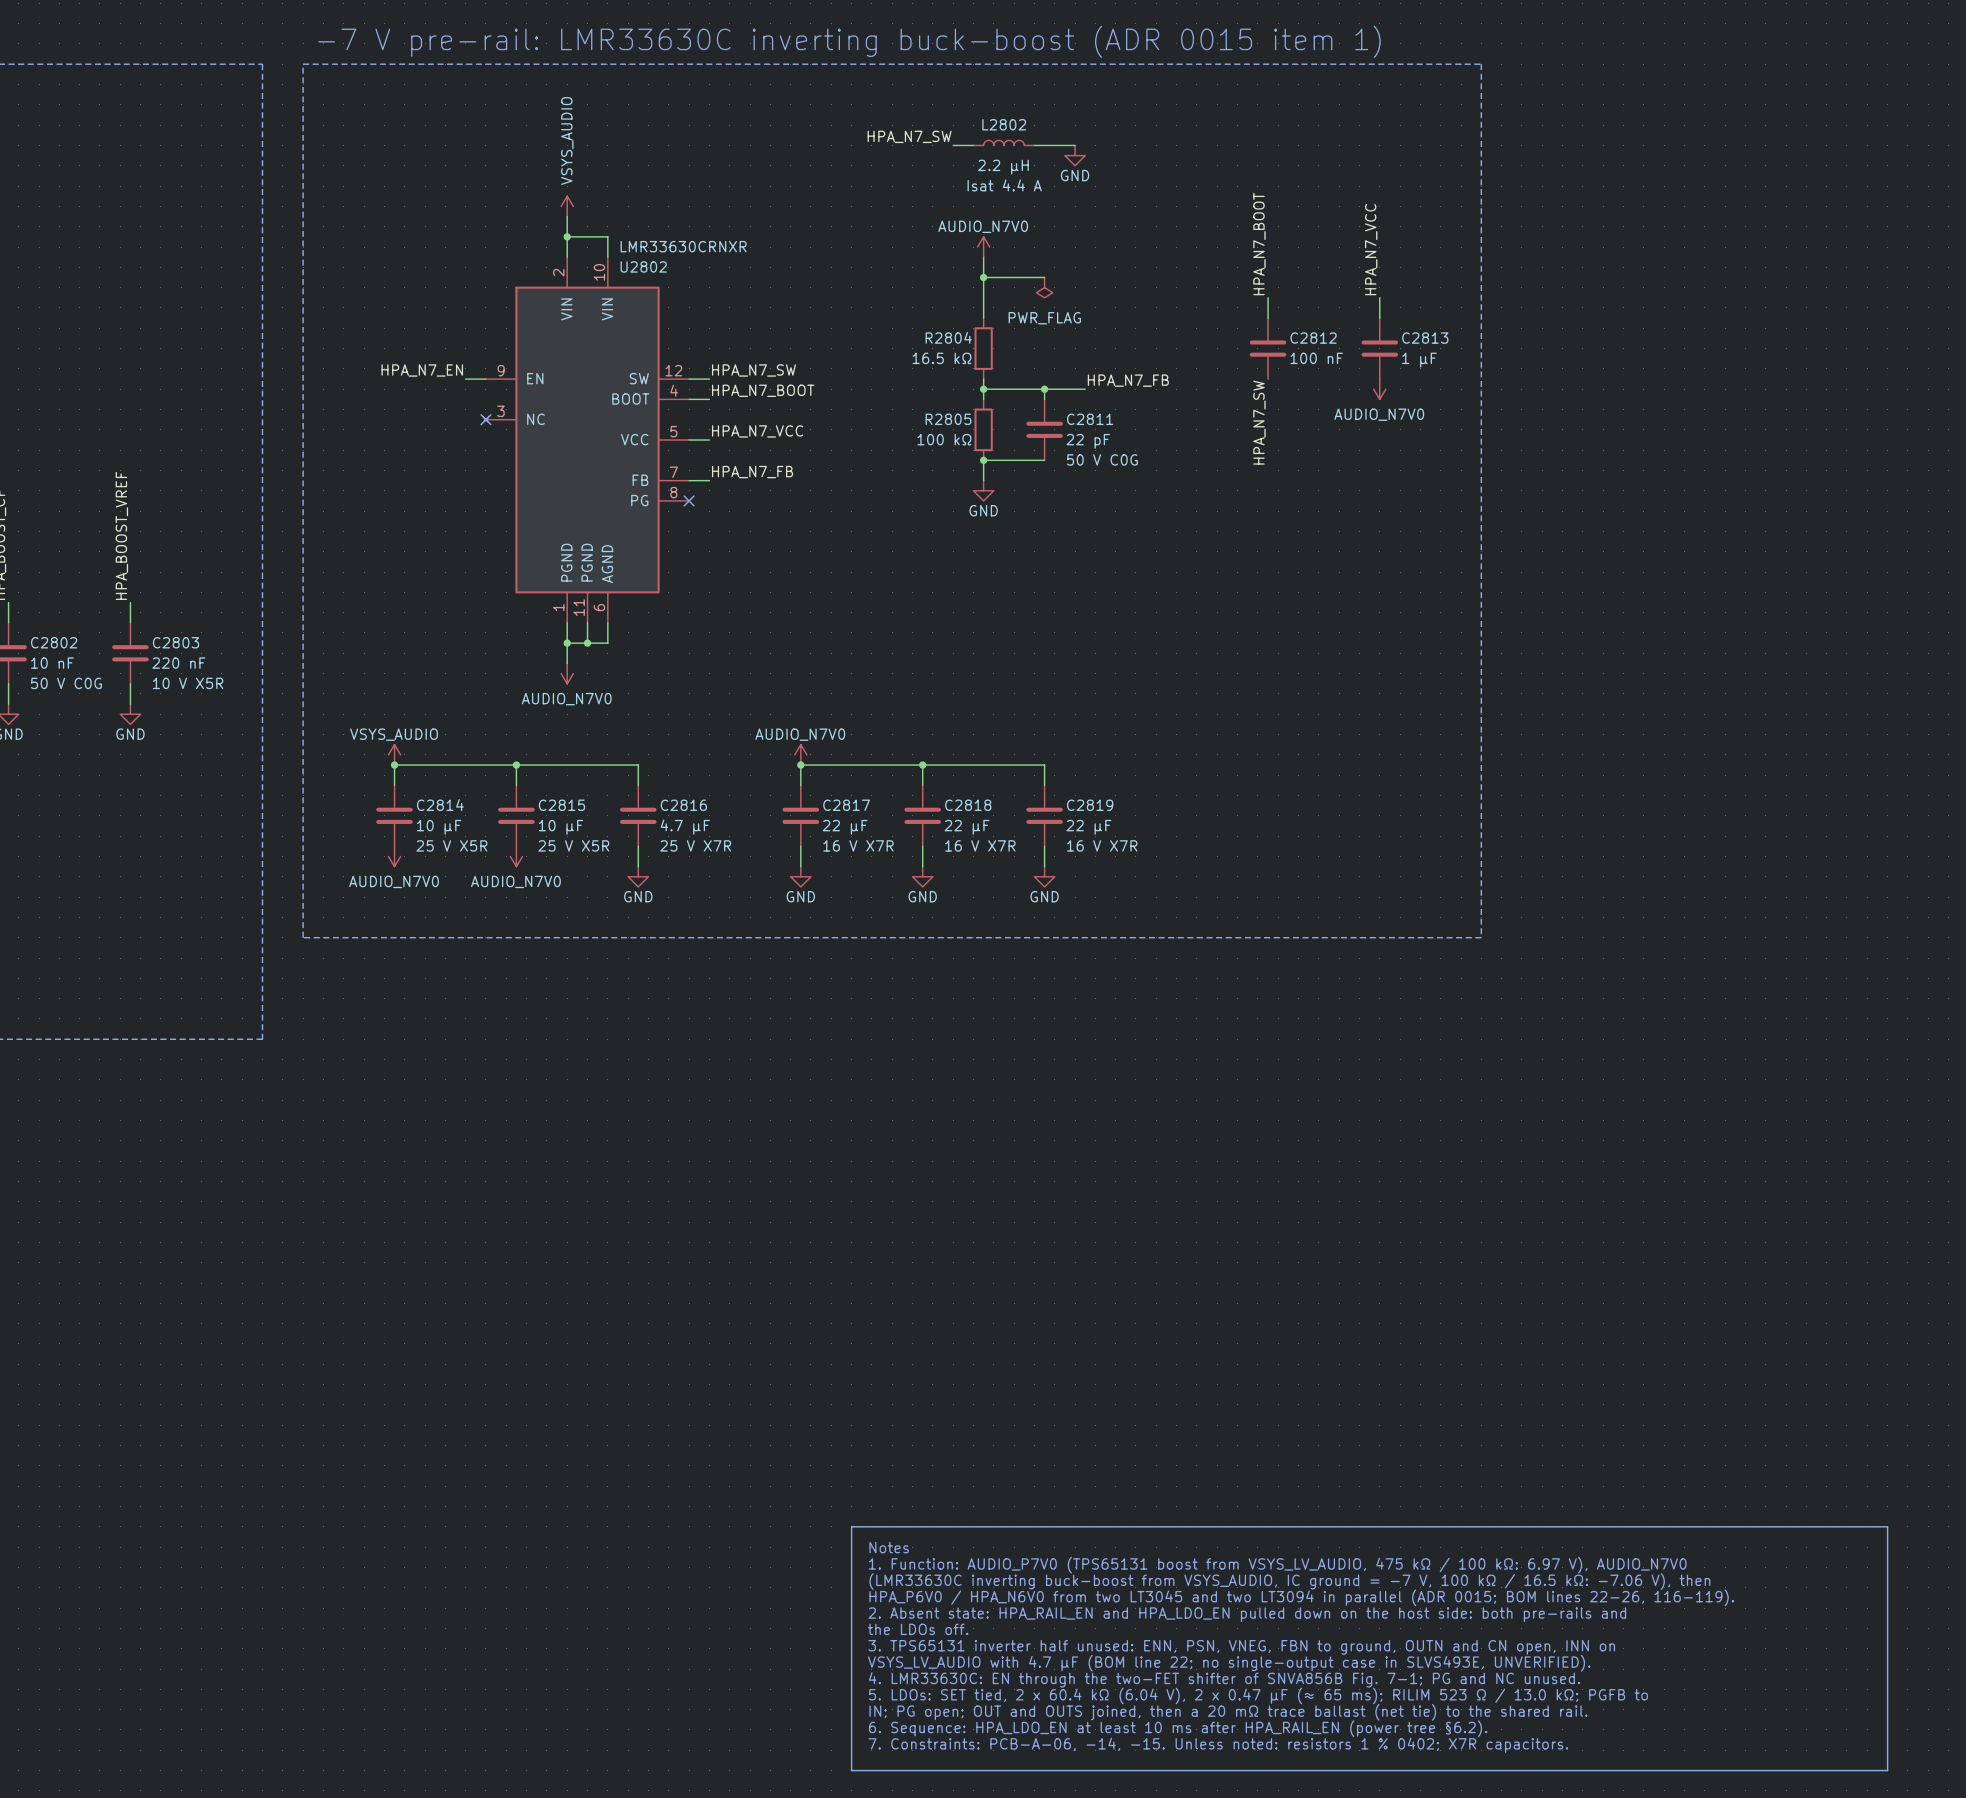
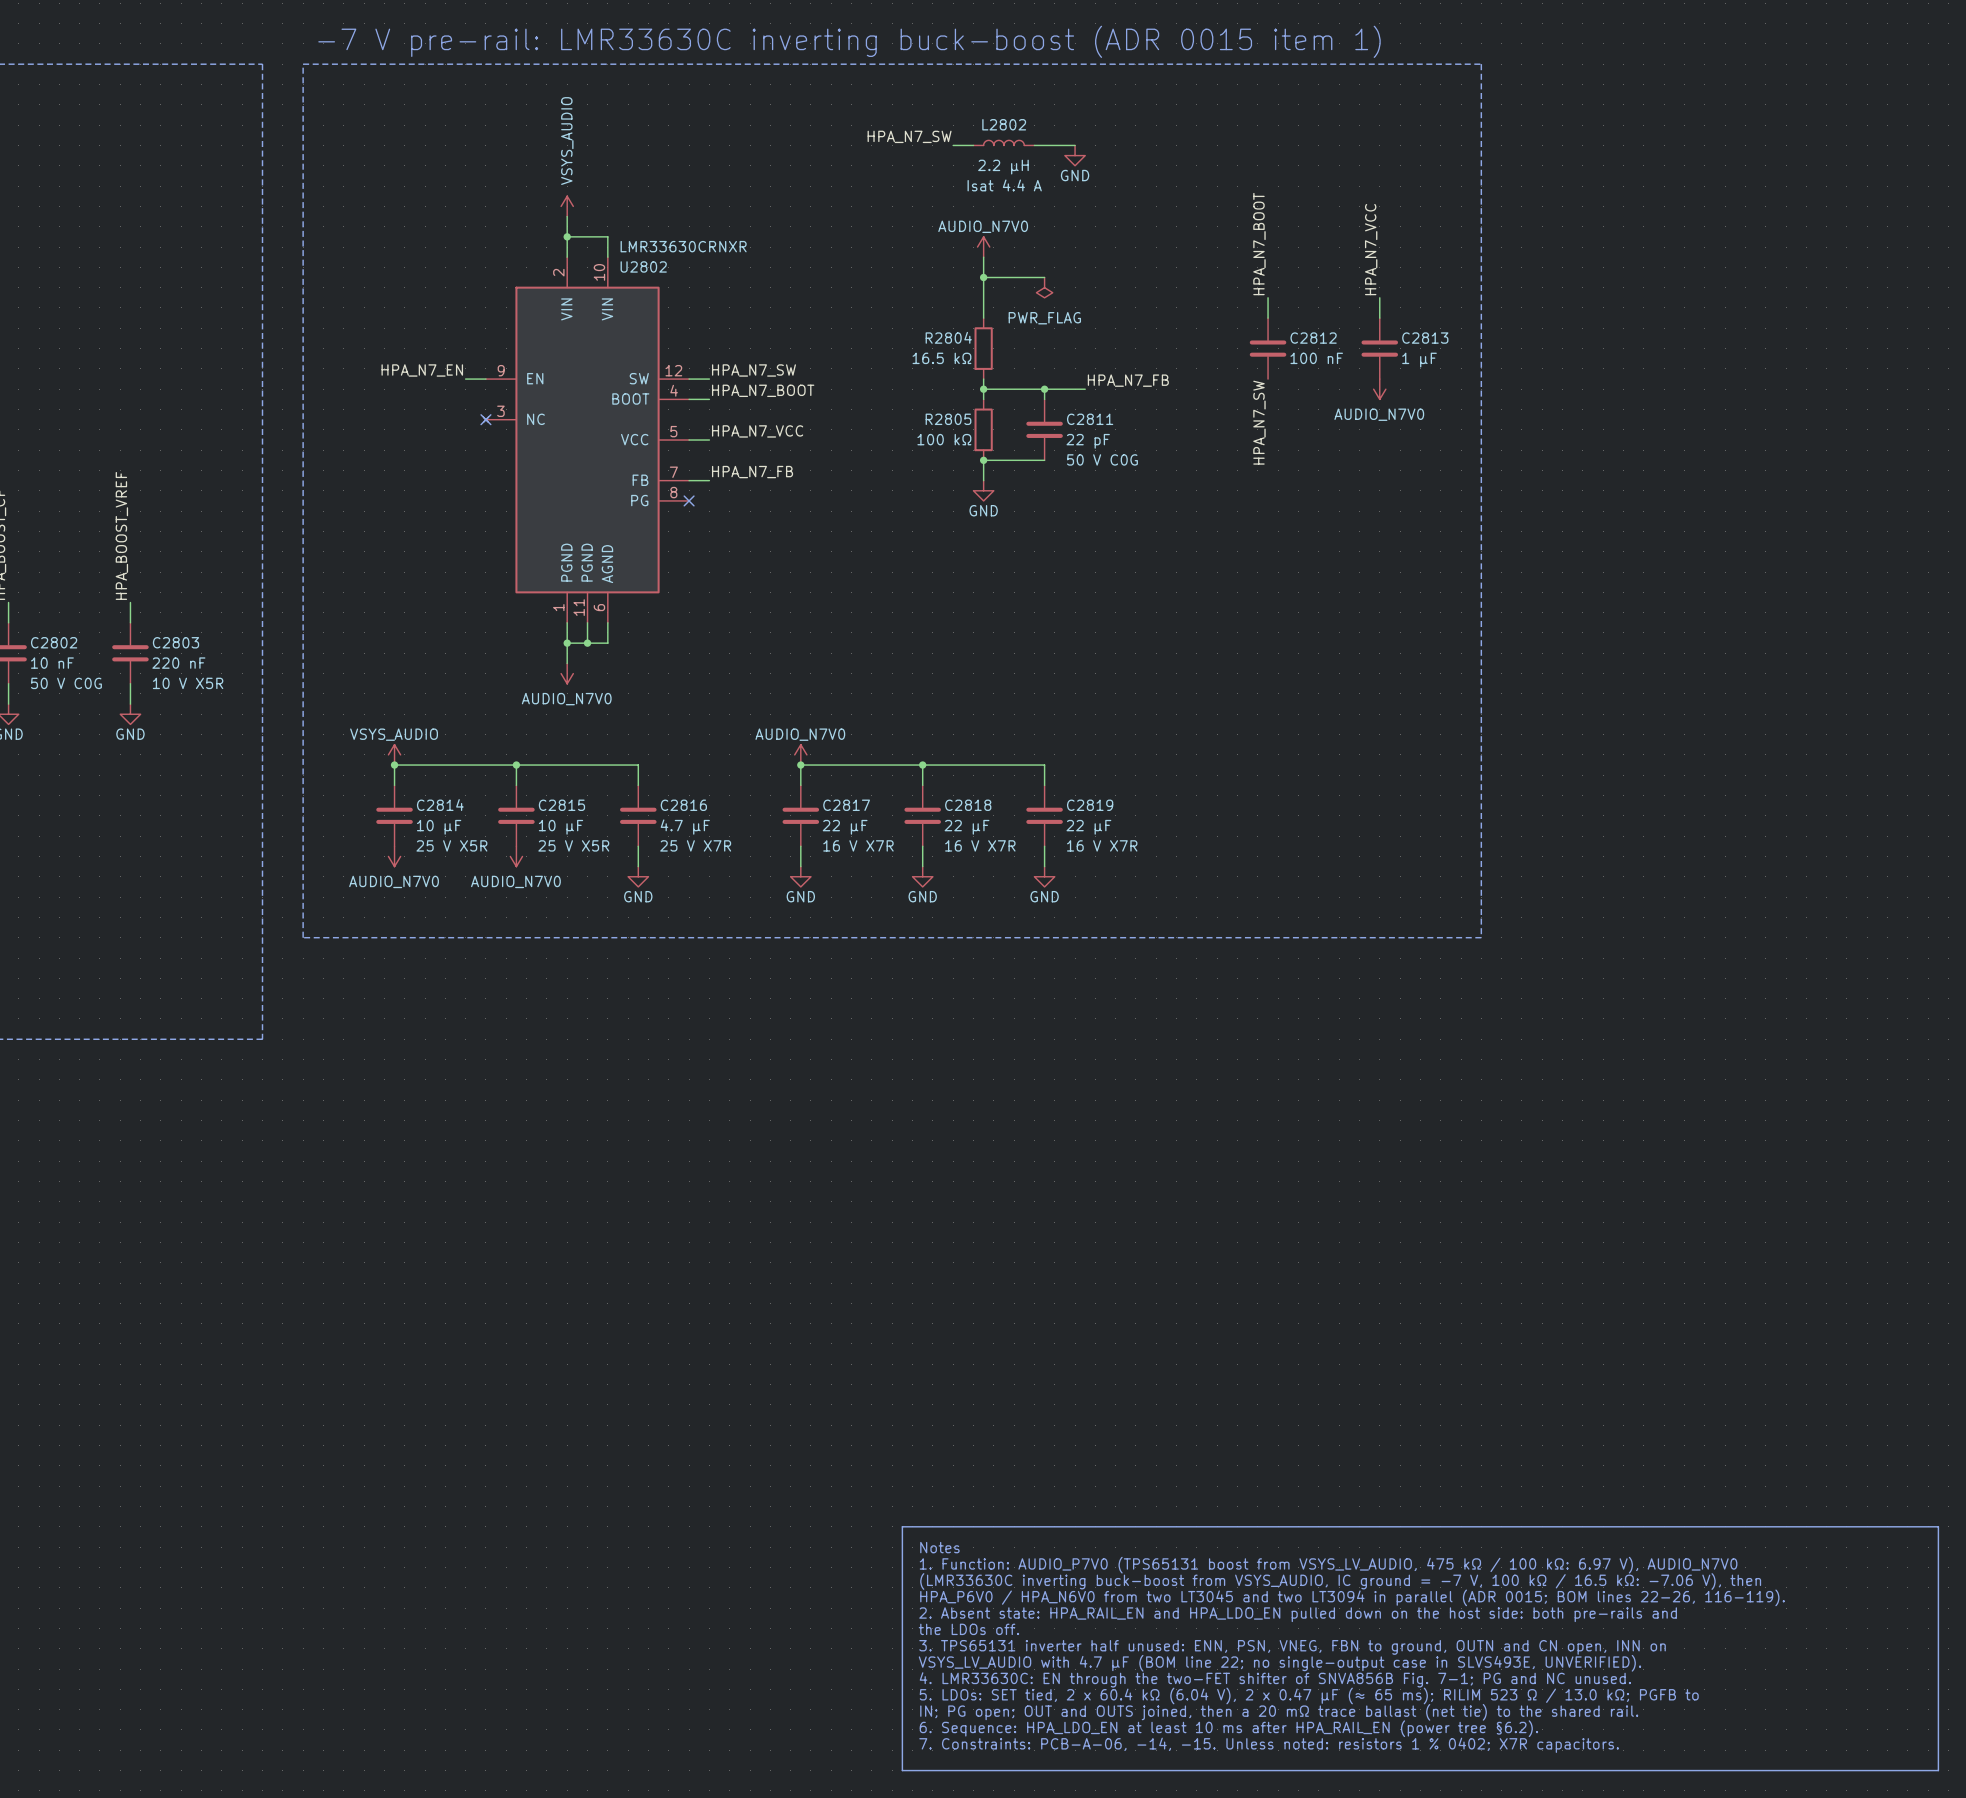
line: (902, 1526) (851, 1526) (851, 1770) (902, 1770) -> (902, 1526) (902, 1770)
line: (1887, 1526) (1887, 1770) -> (1887, 1526) (1938, 1526) (1938, 1770) (1887, 1770)
text position: Notes (889, 1547) -> Notes (939, 1547)
text position: 1. Function: AUDIO_P7V0 (TPS65131 boost from VSYS_LV_AUDIO, 475 kΩ / 100 kΩ: 6.97 V), AUDIO_N7V0 (1277, 1565) -> 1. Function: AUDIO_P7V0 (TPS65131 boost from VSYS_LV_AUDIO, 475 kΩ / 100 kΩ: 6.97 V), AUDIO_N7V0 (1328, 1565)
text position: (LMR33630C inverting buck-boost from VSYS_AUDIO, IC ground = -7 V, 100 kΩ / 16.5 kΩ: -7.06 V), then (1289, 1581) -> (LMR33630C inverting buck-boost from VSYS_AUDIO, IC ground = -7 V, 100 kΩ / 16.5 kΩ: -7.06 V), then (1340, 1581)
text position: HPA_P6V0 / HPA_N6V0 from two LT3045 and two LT3094 in parallel (ADR 0015; BOM lines 22-26, 116-119). (1301, 1597) -> HPA_P6V0 / HPA_N6V0 from two LT3045 and two LT3094 in parallel (ADR 0015; BOM lines 22-26, 116-119). (1352, 1597)
text position: 2. Absent state: HPA_RAIL_EN and HPA_LDO_EN pulled down on the host side: both pre-rails and (1247, 1614) -> 2. Absent state: HPA_RAIL_EN and HPA_LDO_EN pulled down on the host side: both pre-rails and (1298, 1614)
text position: the LDOs off. (918, 1629) -> the LDOs off. (968, 1629)
text position: 3. TPS65131 inverter half unused: ENN, PSN, VNEG, FBN to ground, OUTN and CN open, INN on (1241, 1647) -> 3. TPS65131 inverter half unused: ENN, PSN, VNEG, FBN to ground, OUTN and CN open, INN on (1292, 1647)
text position: VSYS_LV_AUDIO with 4.7 µF (BOM line 22; no single-output case in SLVS493E, UNVERIFIED). (1229, 1663) -> VSYS_LV_AUDIO with 4.7 µF (BOM line 22; no single-output case in SLVS493E, UNVERIFIED). (1279, 1663)
text position: 4. LMR33630C: EN through the two-FET shifter of SNVA856B Fig. 7-1; PG and NC unused. (1224, 1679) -> 4. LMR33630C: EN through the two-FET shifter of SNVA856B Fig. 7-1; PG and NC unused. (1275, 1679)
text position: 5. LDOs: SET tied, 2 x 60.4 kΩ (6.04 V), 2 x 0.47 µF (≈ 65 ms); RILIM 523 Ω / 13.0 kΩ; PGFB to (1258, 1695) -> 5. LDOs: SET tied, 2 x 60.4 kΩ (6.04 V), 2 x 0.47 µF (≈ 65 ms); RILIM 523 Ω / 13.0 kΩ; PGFB to (1309, 1695)
text position: IN; PG open; OUT and OUTS joined, then a 20 mΩ trace ballast (net tie) to the shared rail. (1228, 1712) -> IN; PG open; OUT and OUTS joined, then a 20 mΩ trace ballast (net tie) to the shared rail. (1279, 1712)
text position: 6. Sequence: HPA_LDO_EN at least 10 ms after HPA_RAIL_EN (power tree §6.2). (1178, 1728) -> 6. Sequence: HPA_LDO_EN at least 10 ms after HPA_RAIL_EN (power tree §6.2). (1228, 1728)
text position: 7. Constraints: PCB-A-06, -14, -15. Unless noted: resistors 1 % 0402; X7R capacitors. (1218, 1745) -> 7. Constraints: PCB-A-06, -14, -15. Unless noted: resistors 1 % 0402; X7R capacitors. (1269, 1745)

